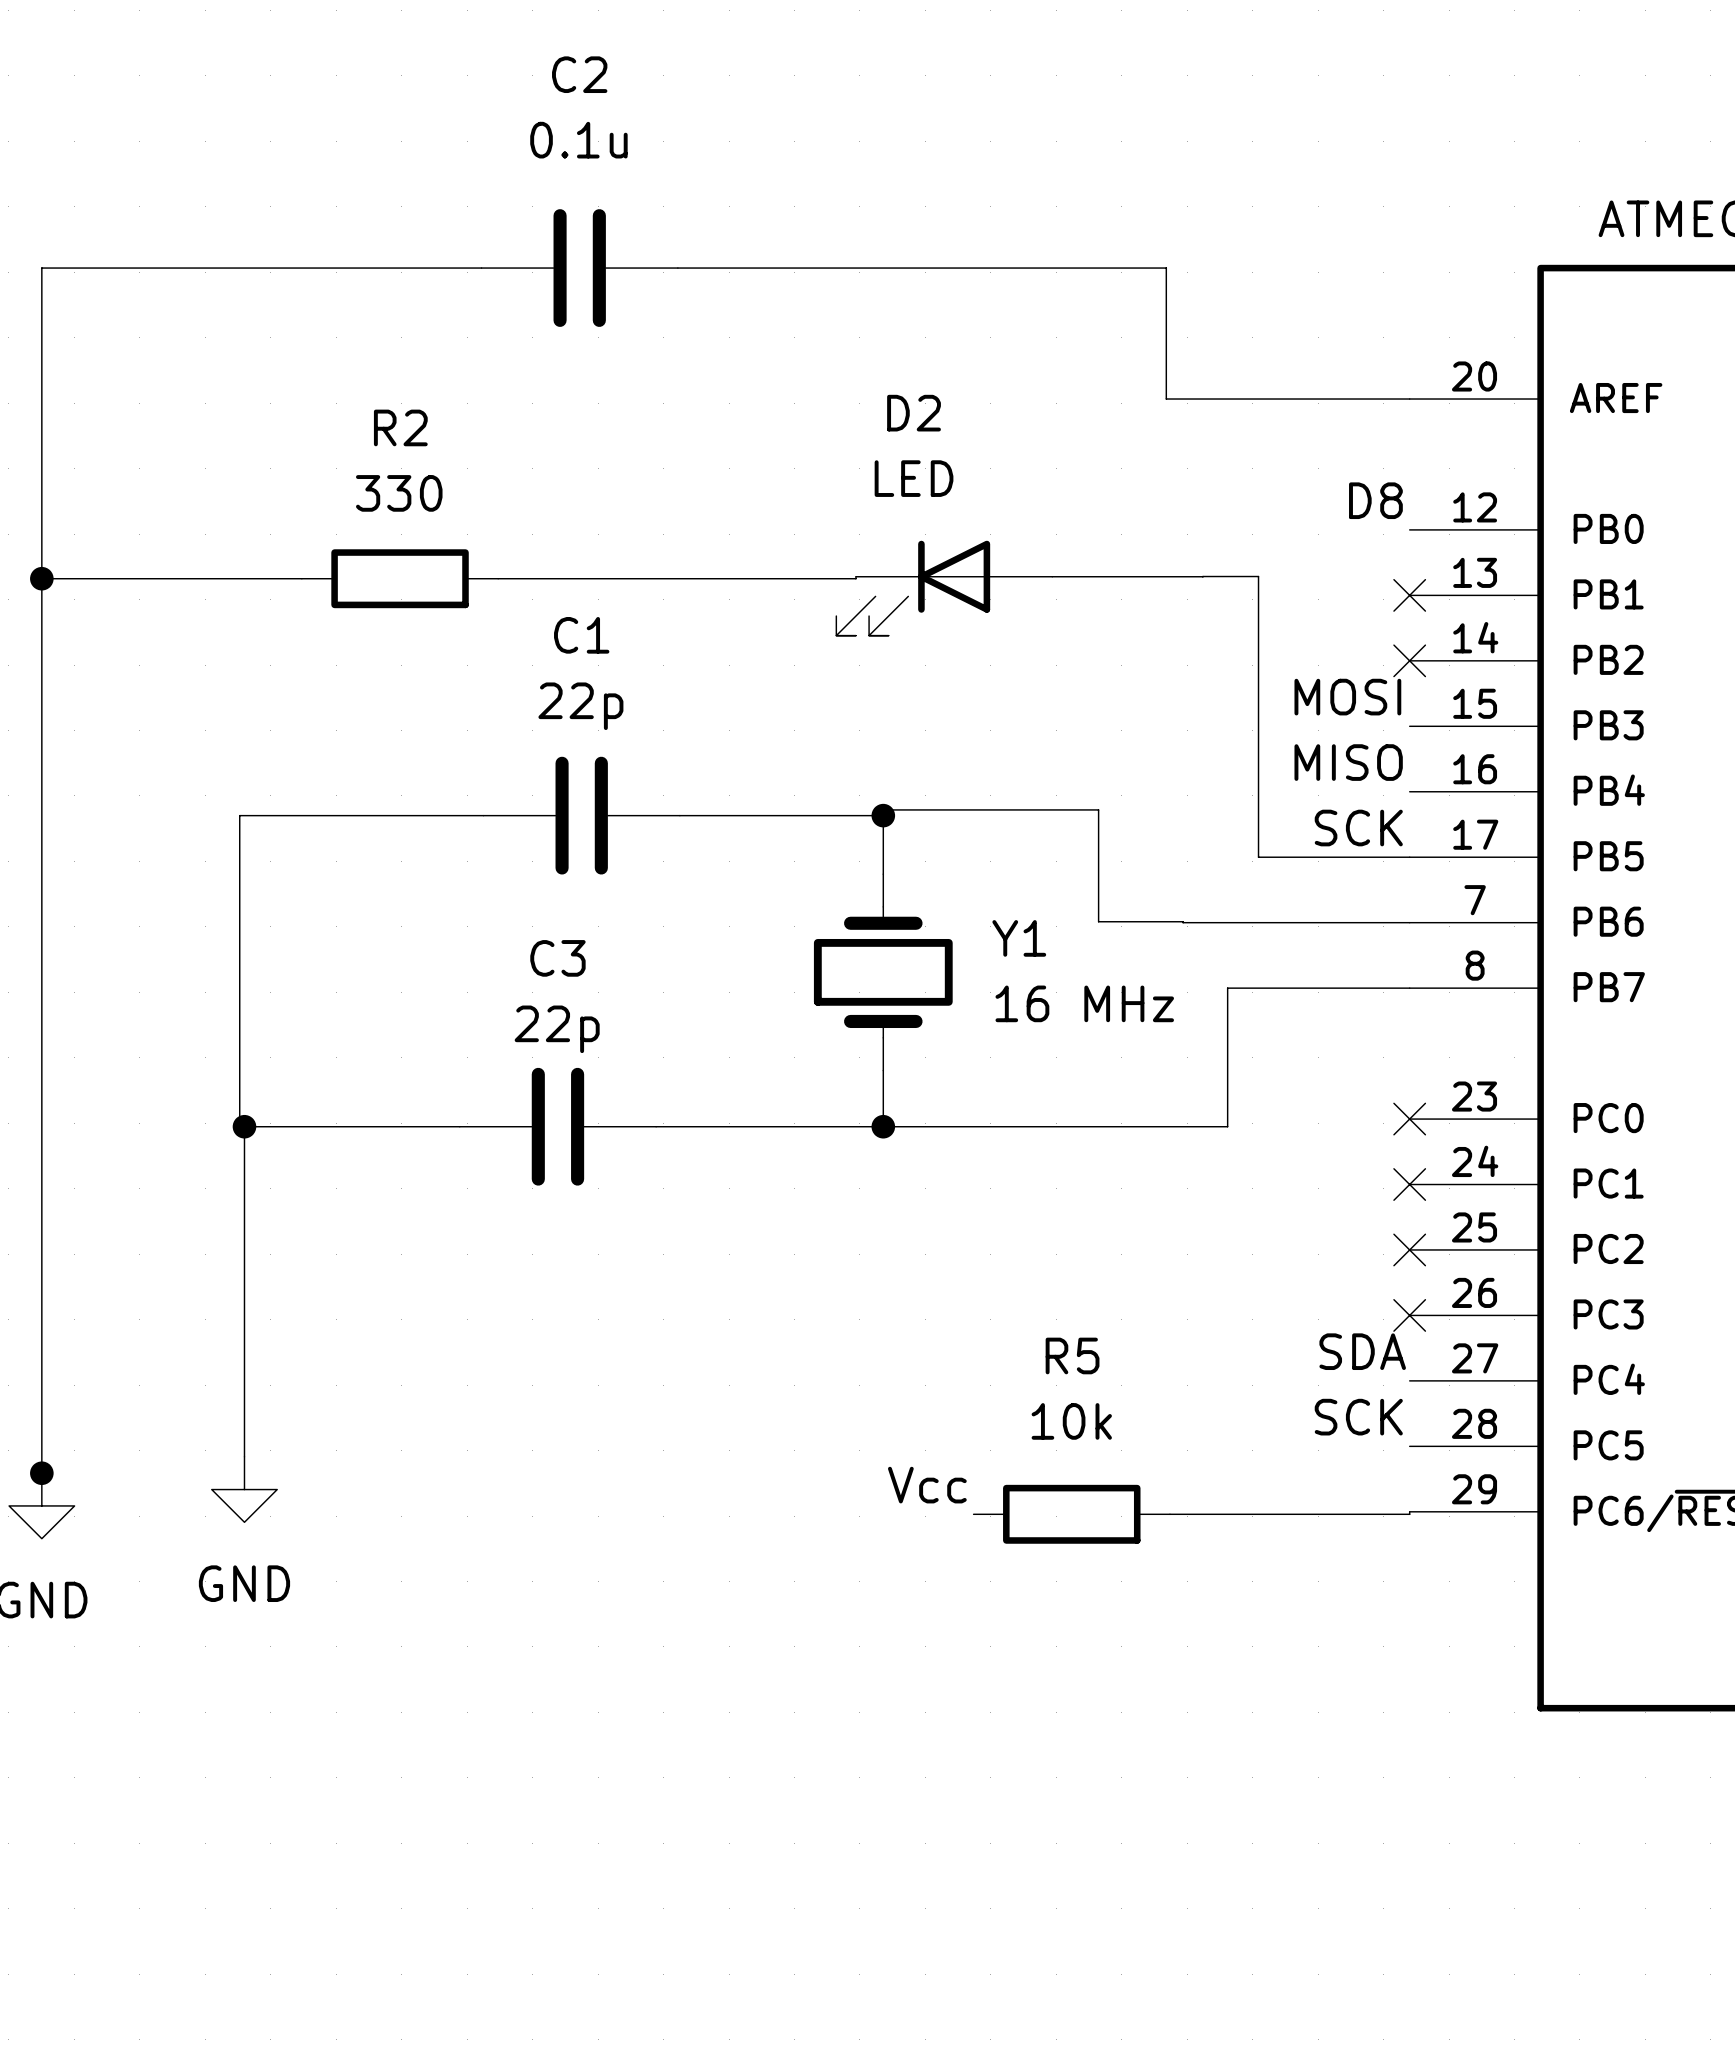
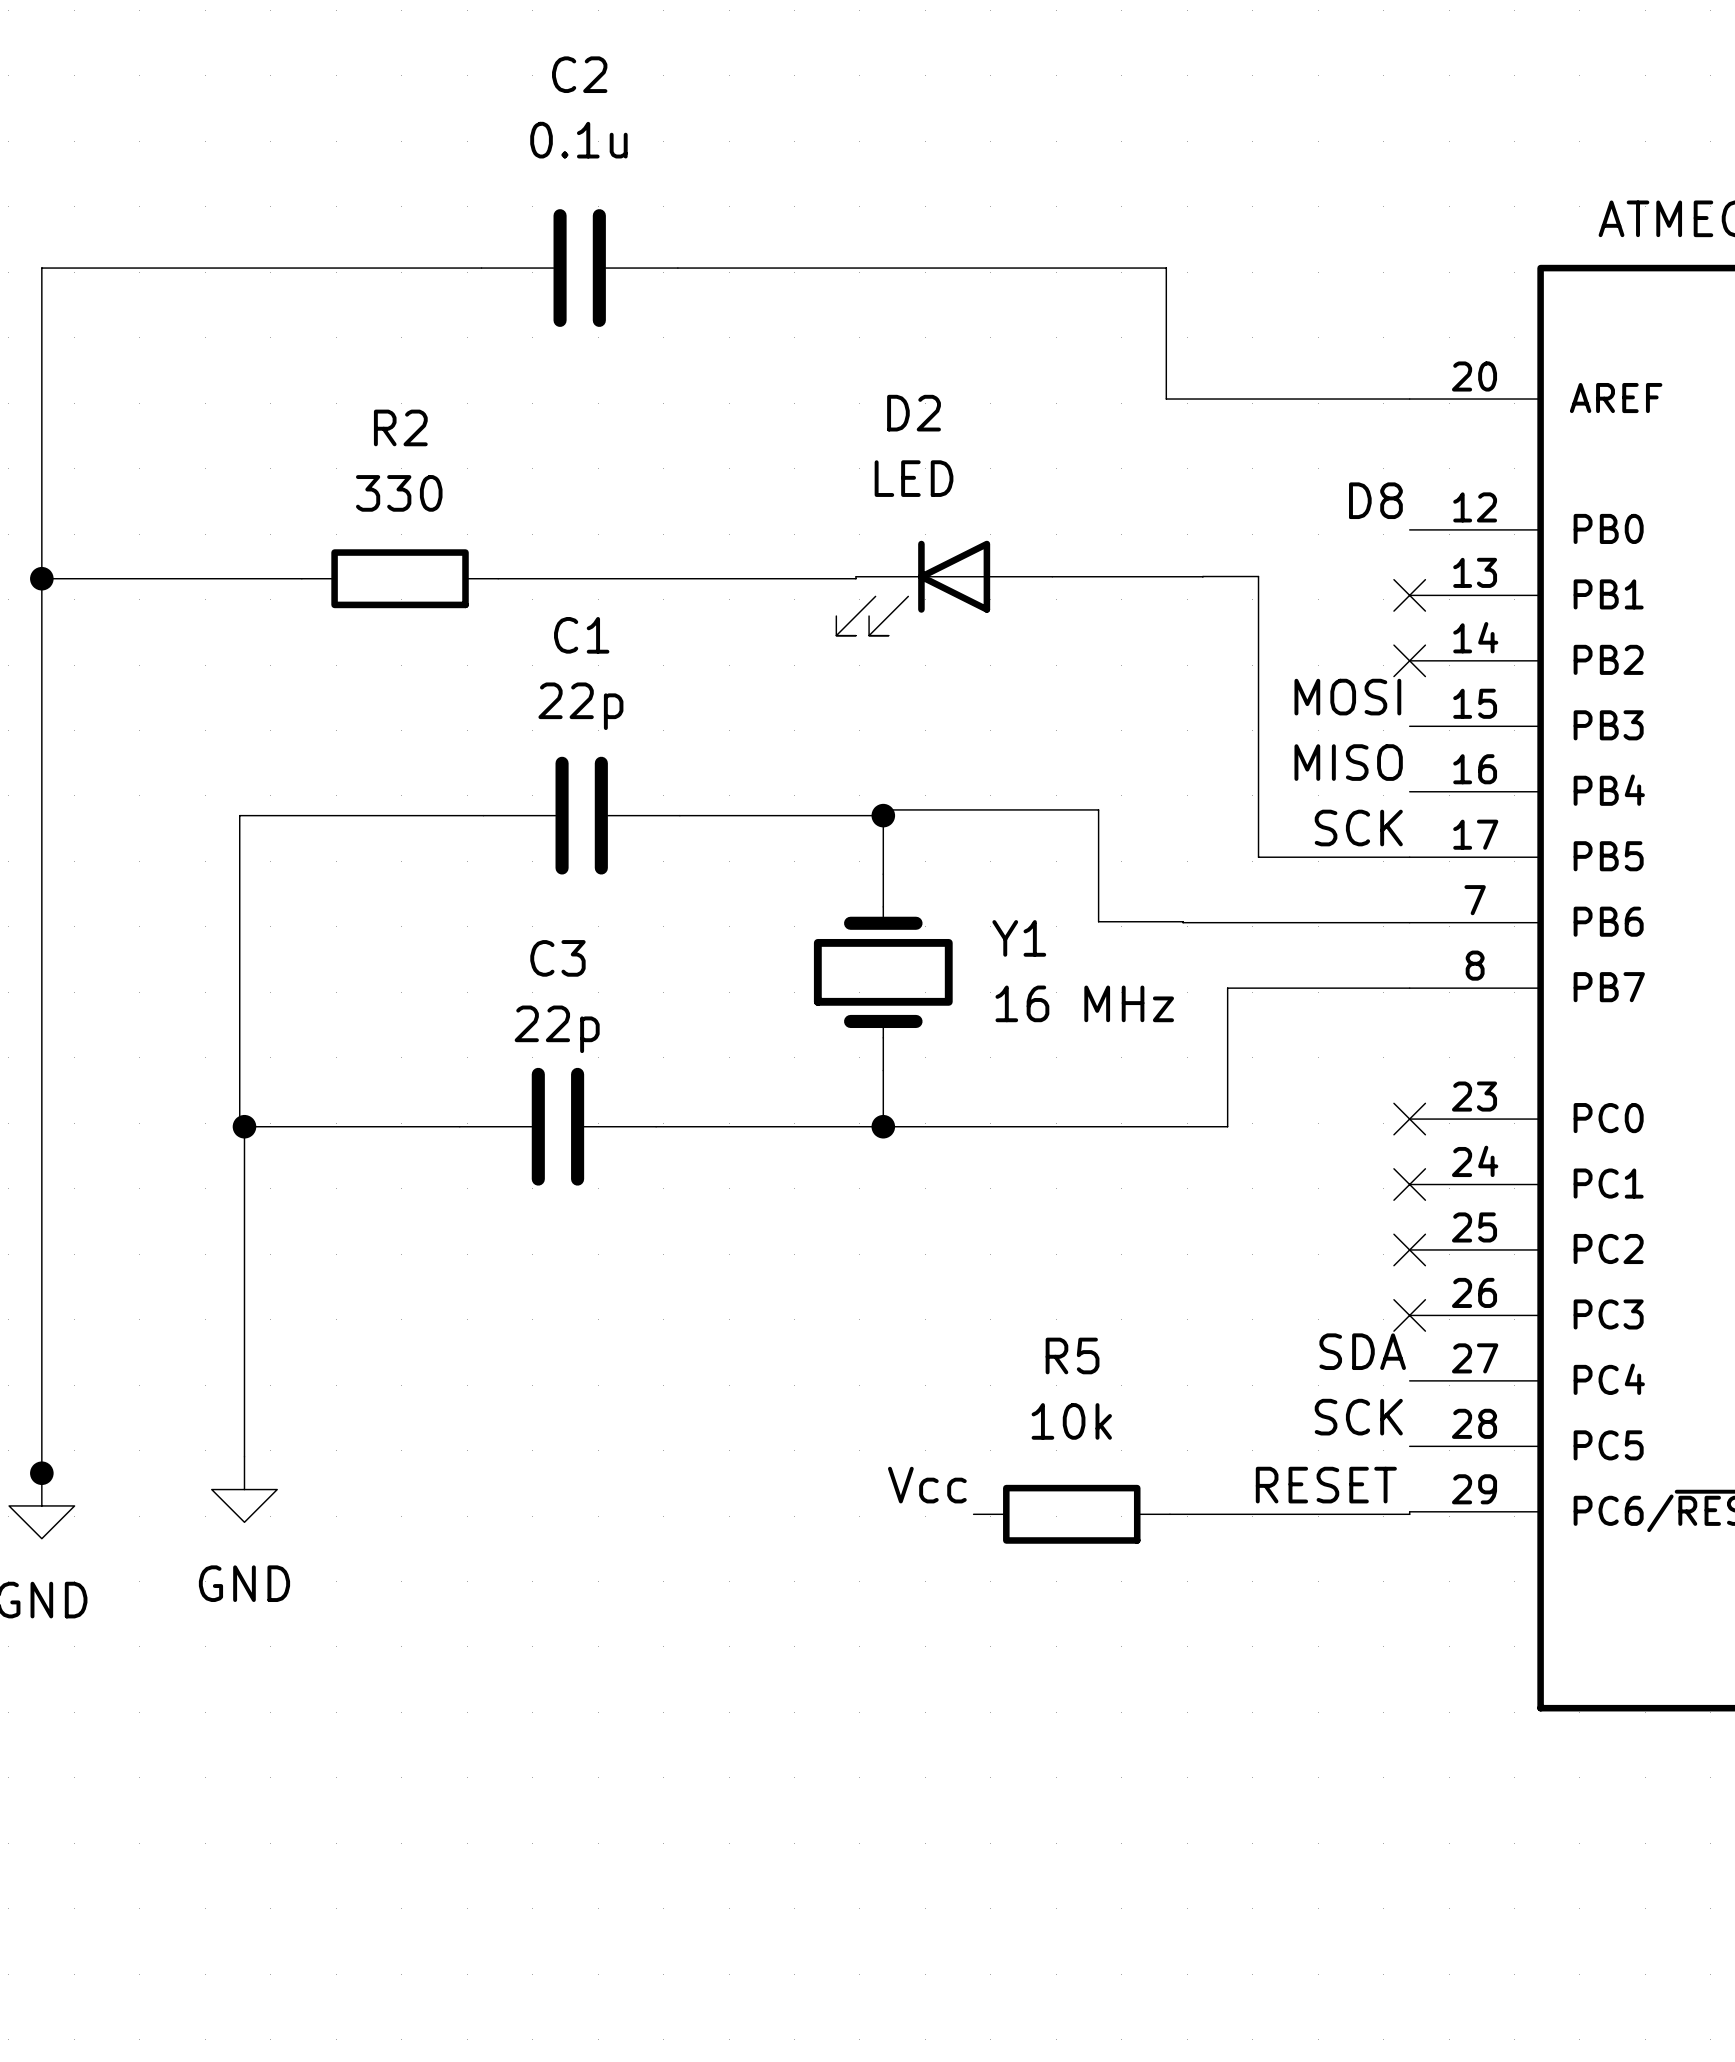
label: none -> RESET (1326, 1485)

